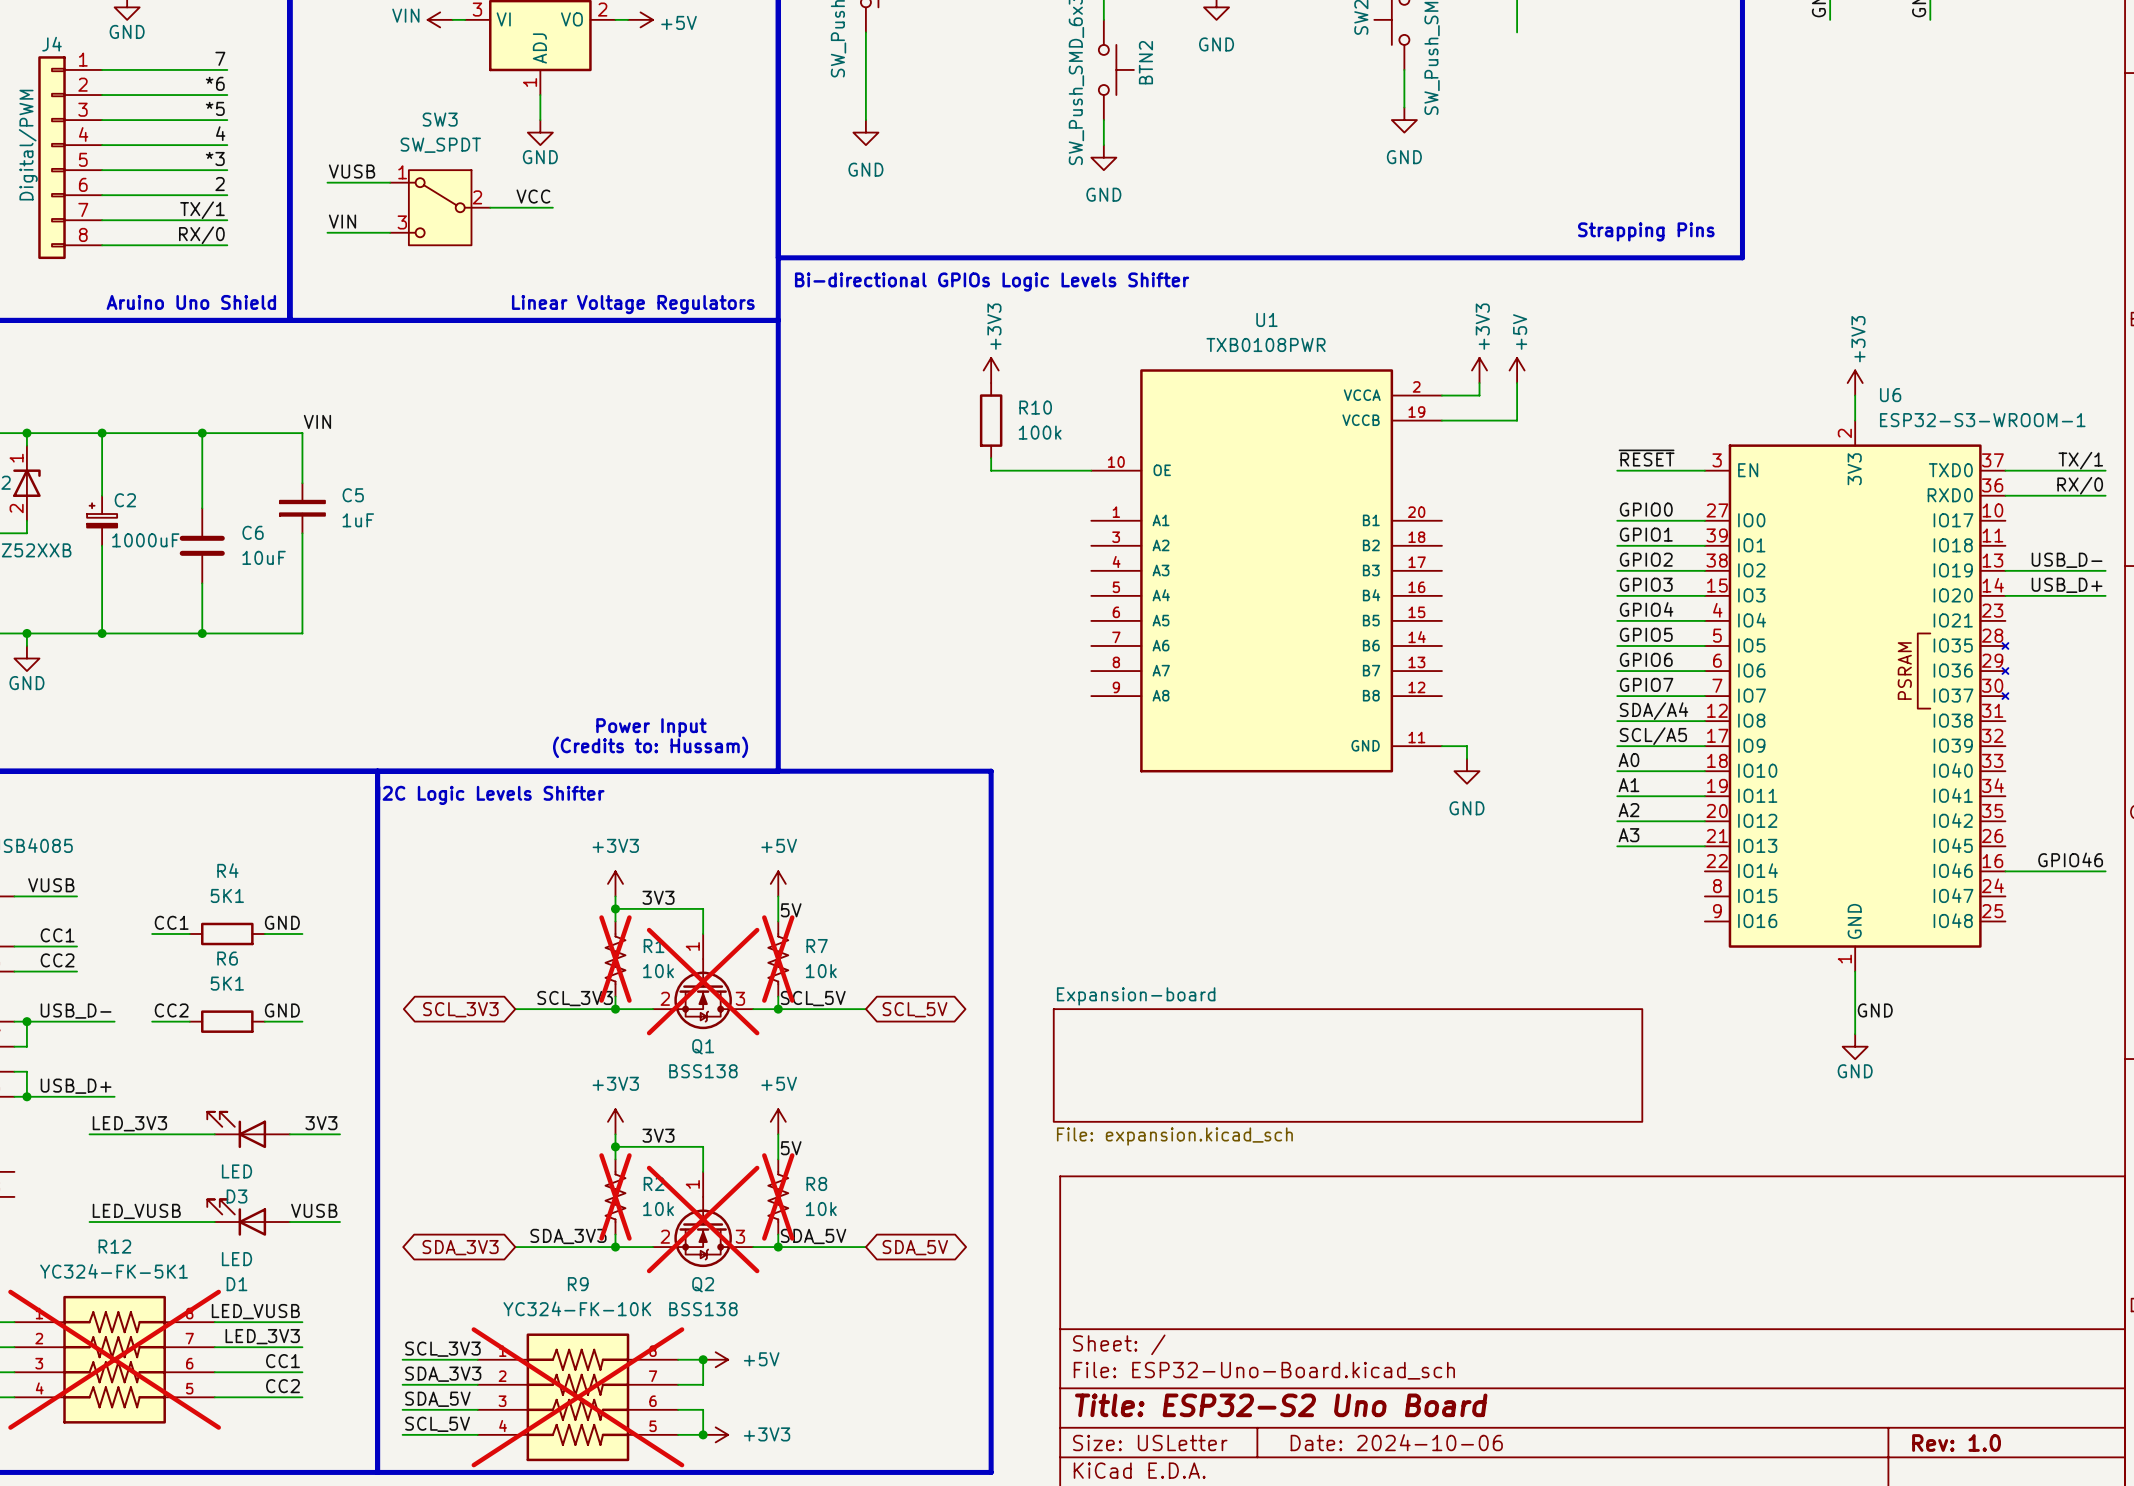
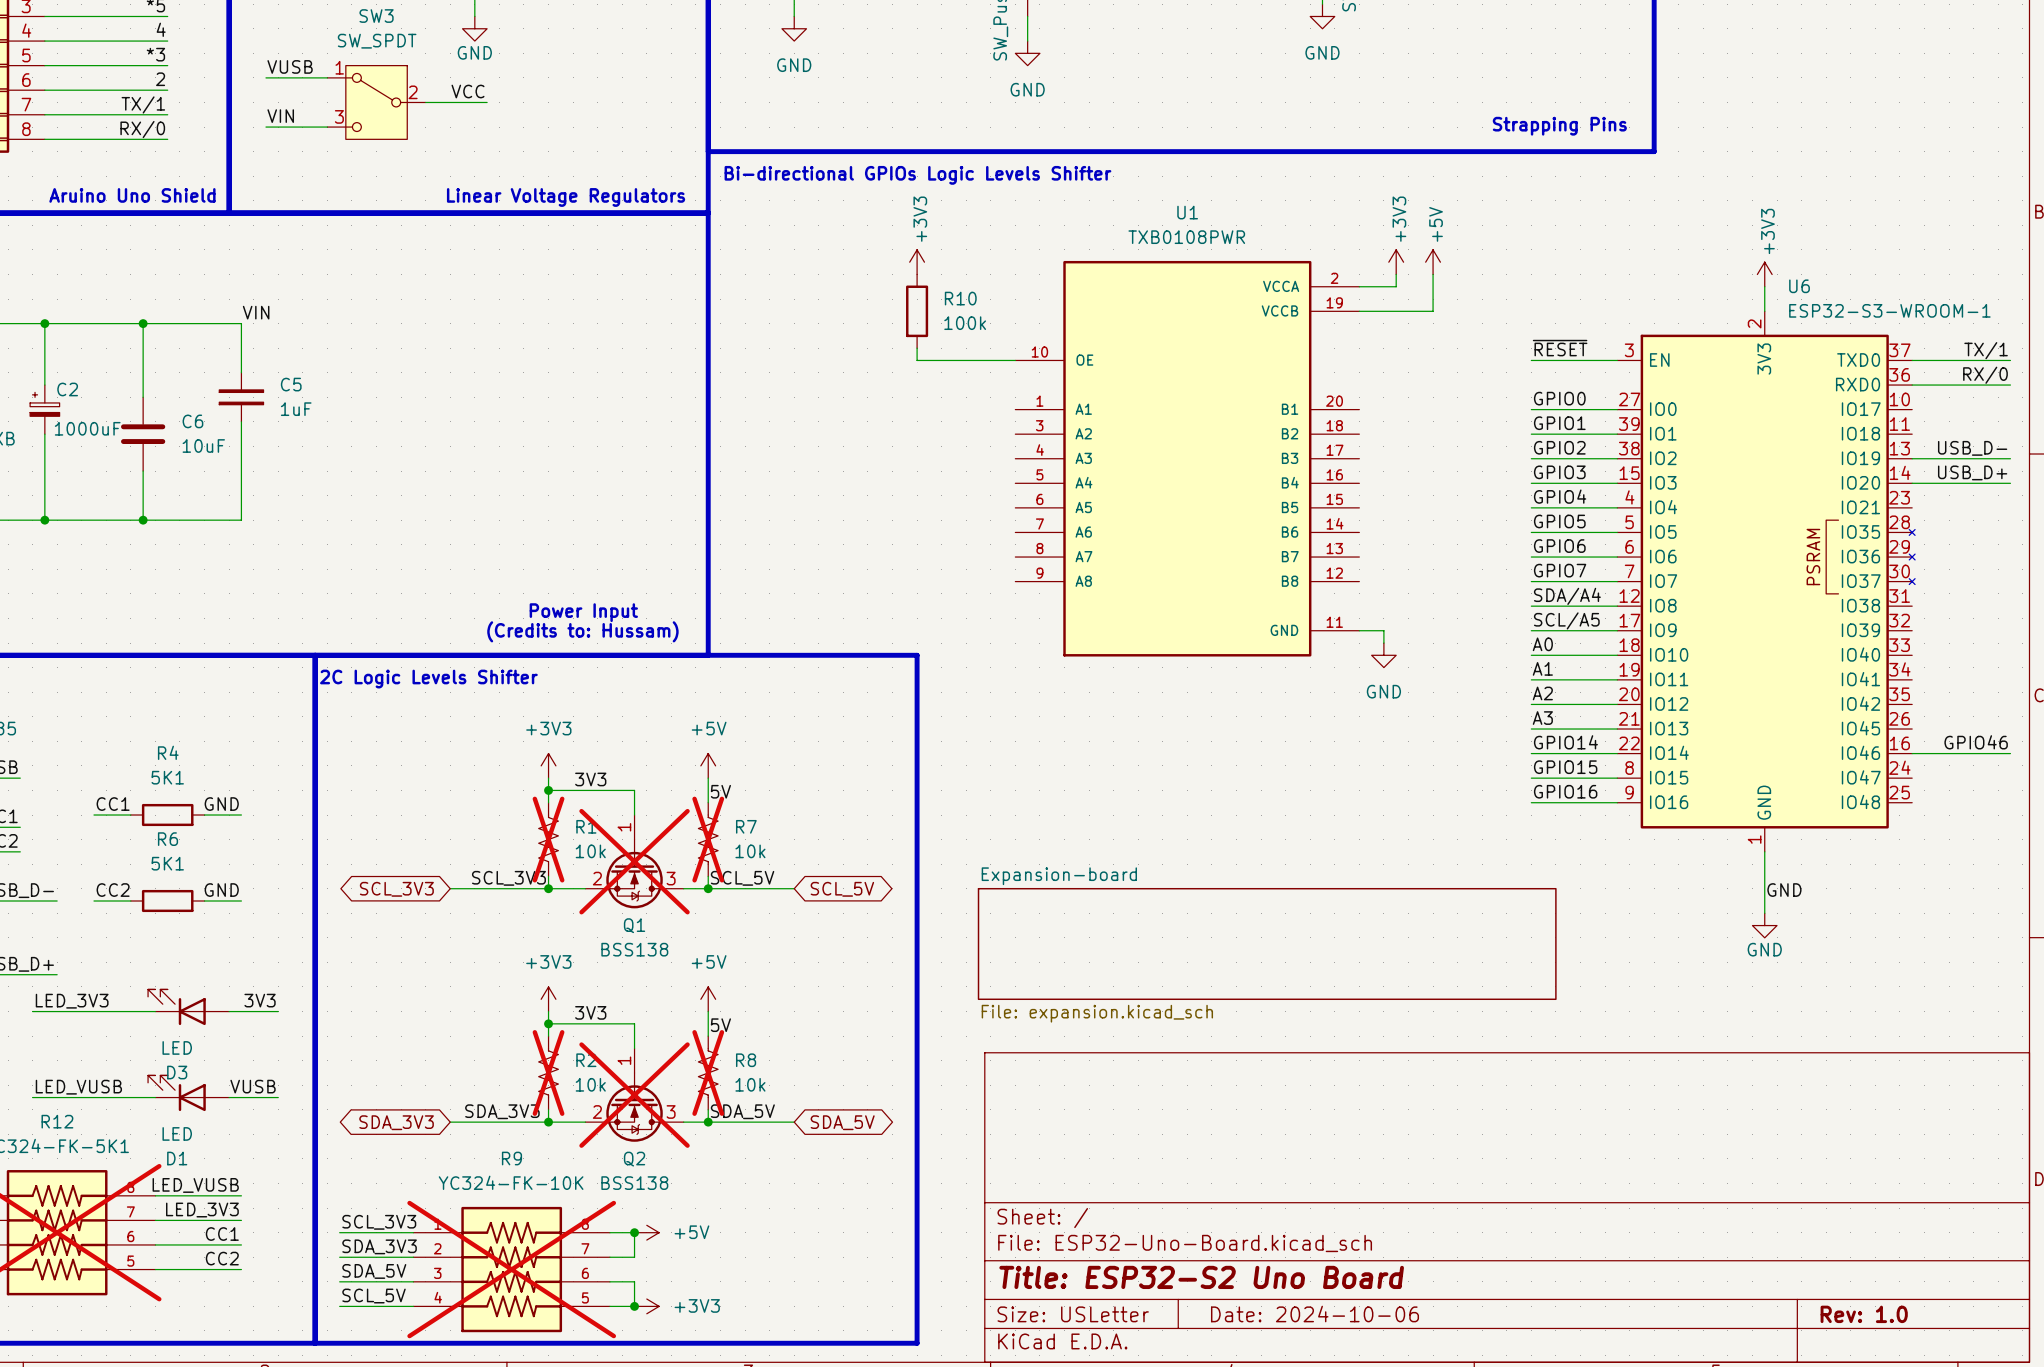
label: none -> GPIO14 (1565, 742)
wire: none -> (1531, 753) (1617, 753)
label: none -> GPIO15 (1565, 767)
wire: none -> (1531, 778) (1617, 778)
label: none -> GPIO16 (1565, 791)
wire: none -> (1531, 802) (1617, 802)

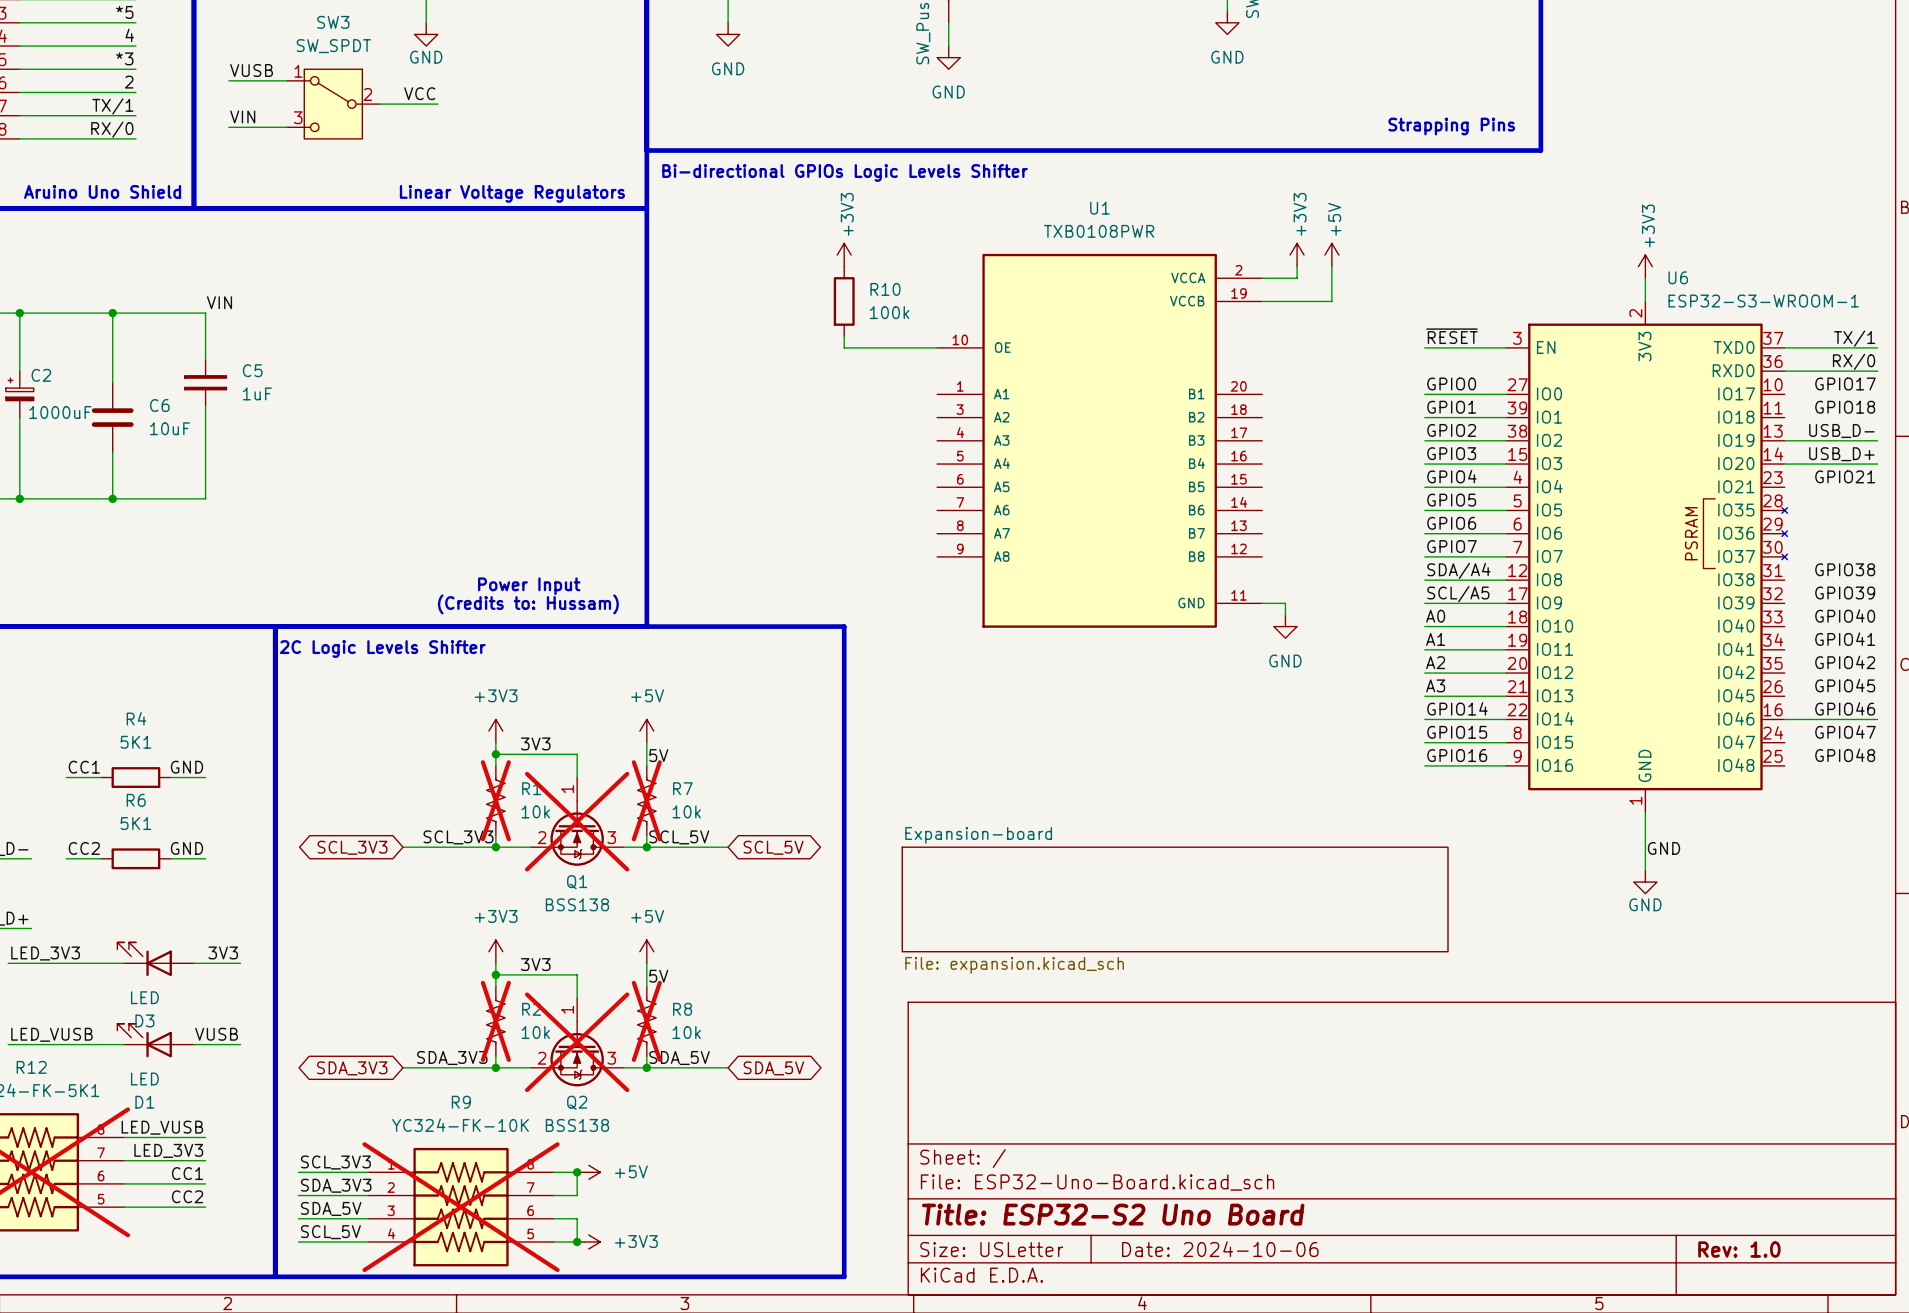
label: none -> GPIO17 (1845, 384)
label: none -> GPIO18 (1845, 407)
label: none -> GPIO21 (1845, 476)
label: none -> GPIO38 (1845, 569)
label: none -> GPIO39 (1845, 593)
label: none -> GPIO40 (1845, 615)
label: none -> GPIO41 (1845, 639)
label: none -> GPIO42 (1845, 662)
label: none -> GPIO45 (1845, 685)
label: none -> GPIO47 (1845, 732)
label: none -> GPIO48 (1845, 755)

